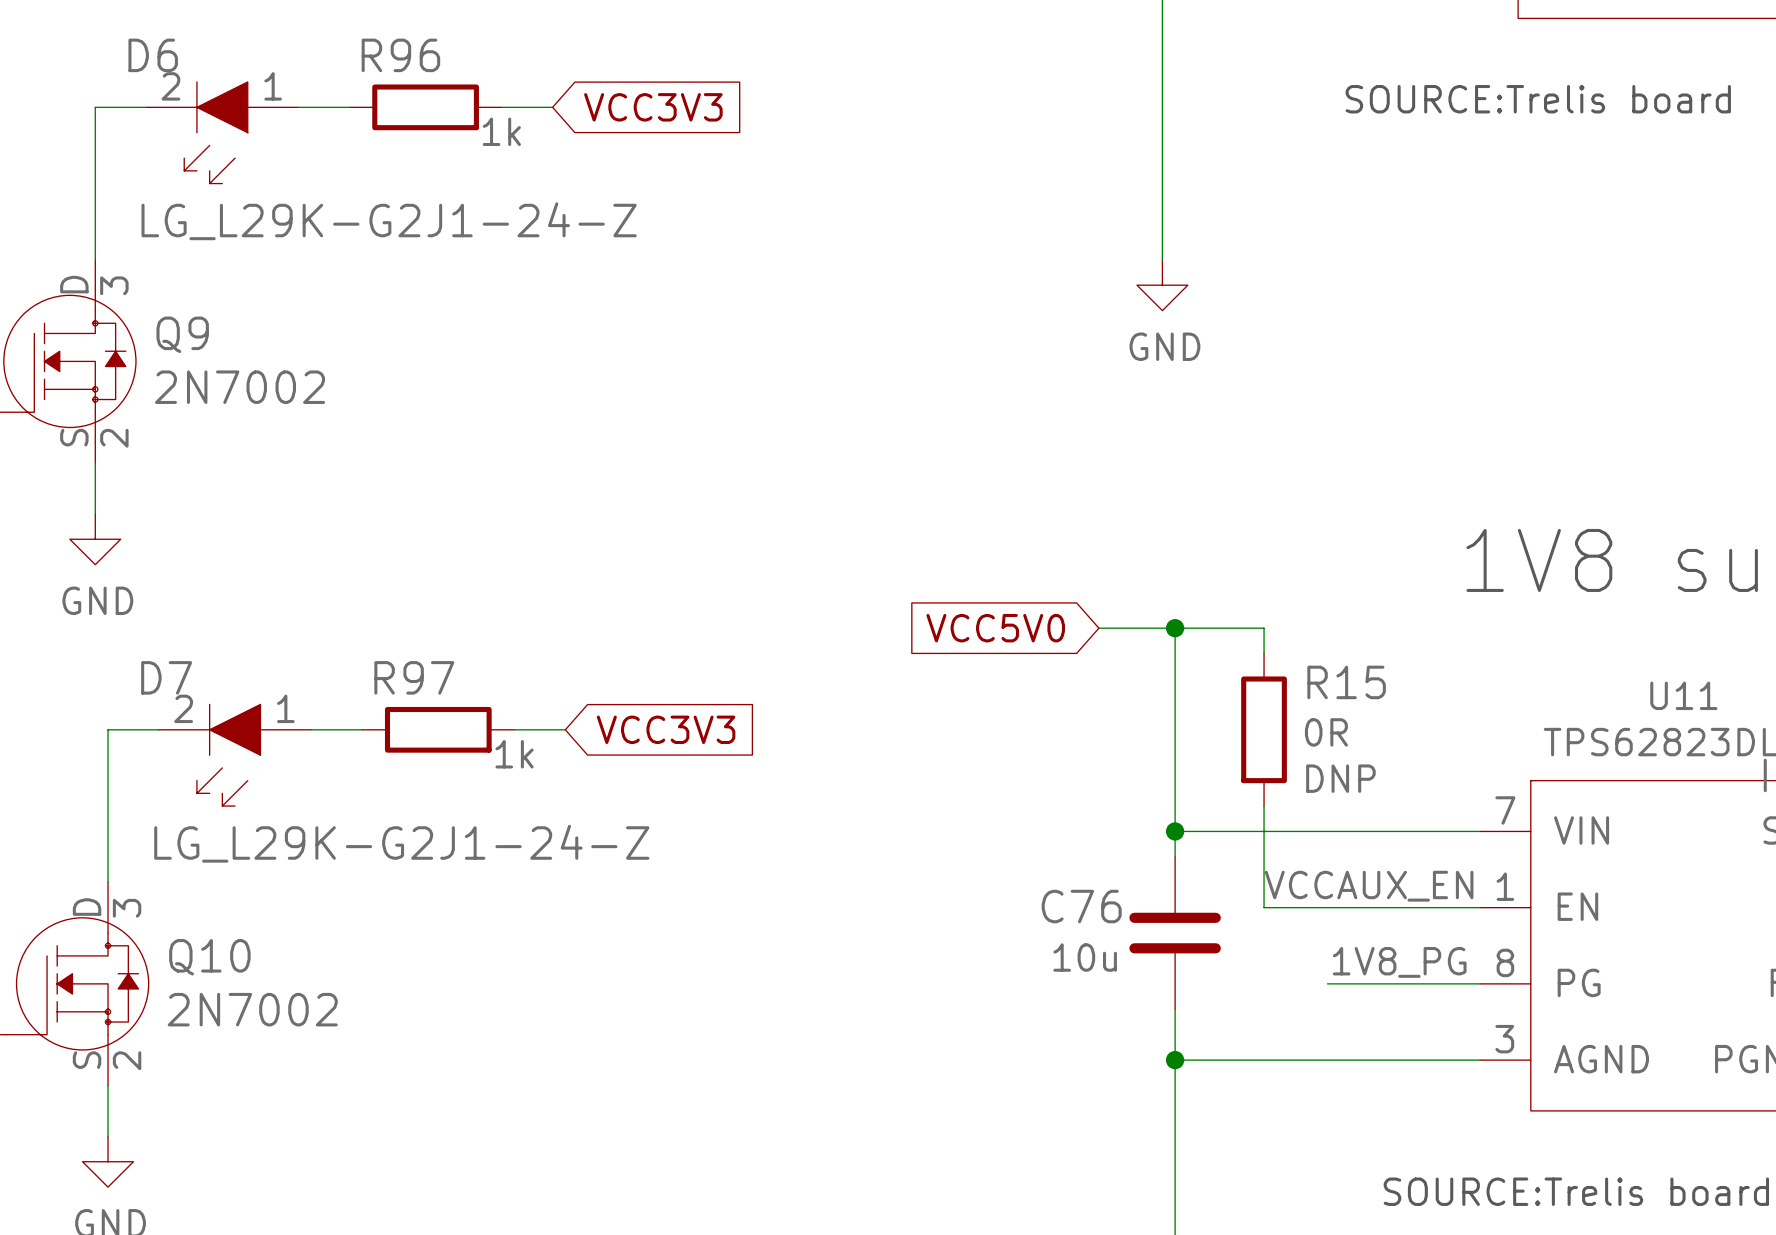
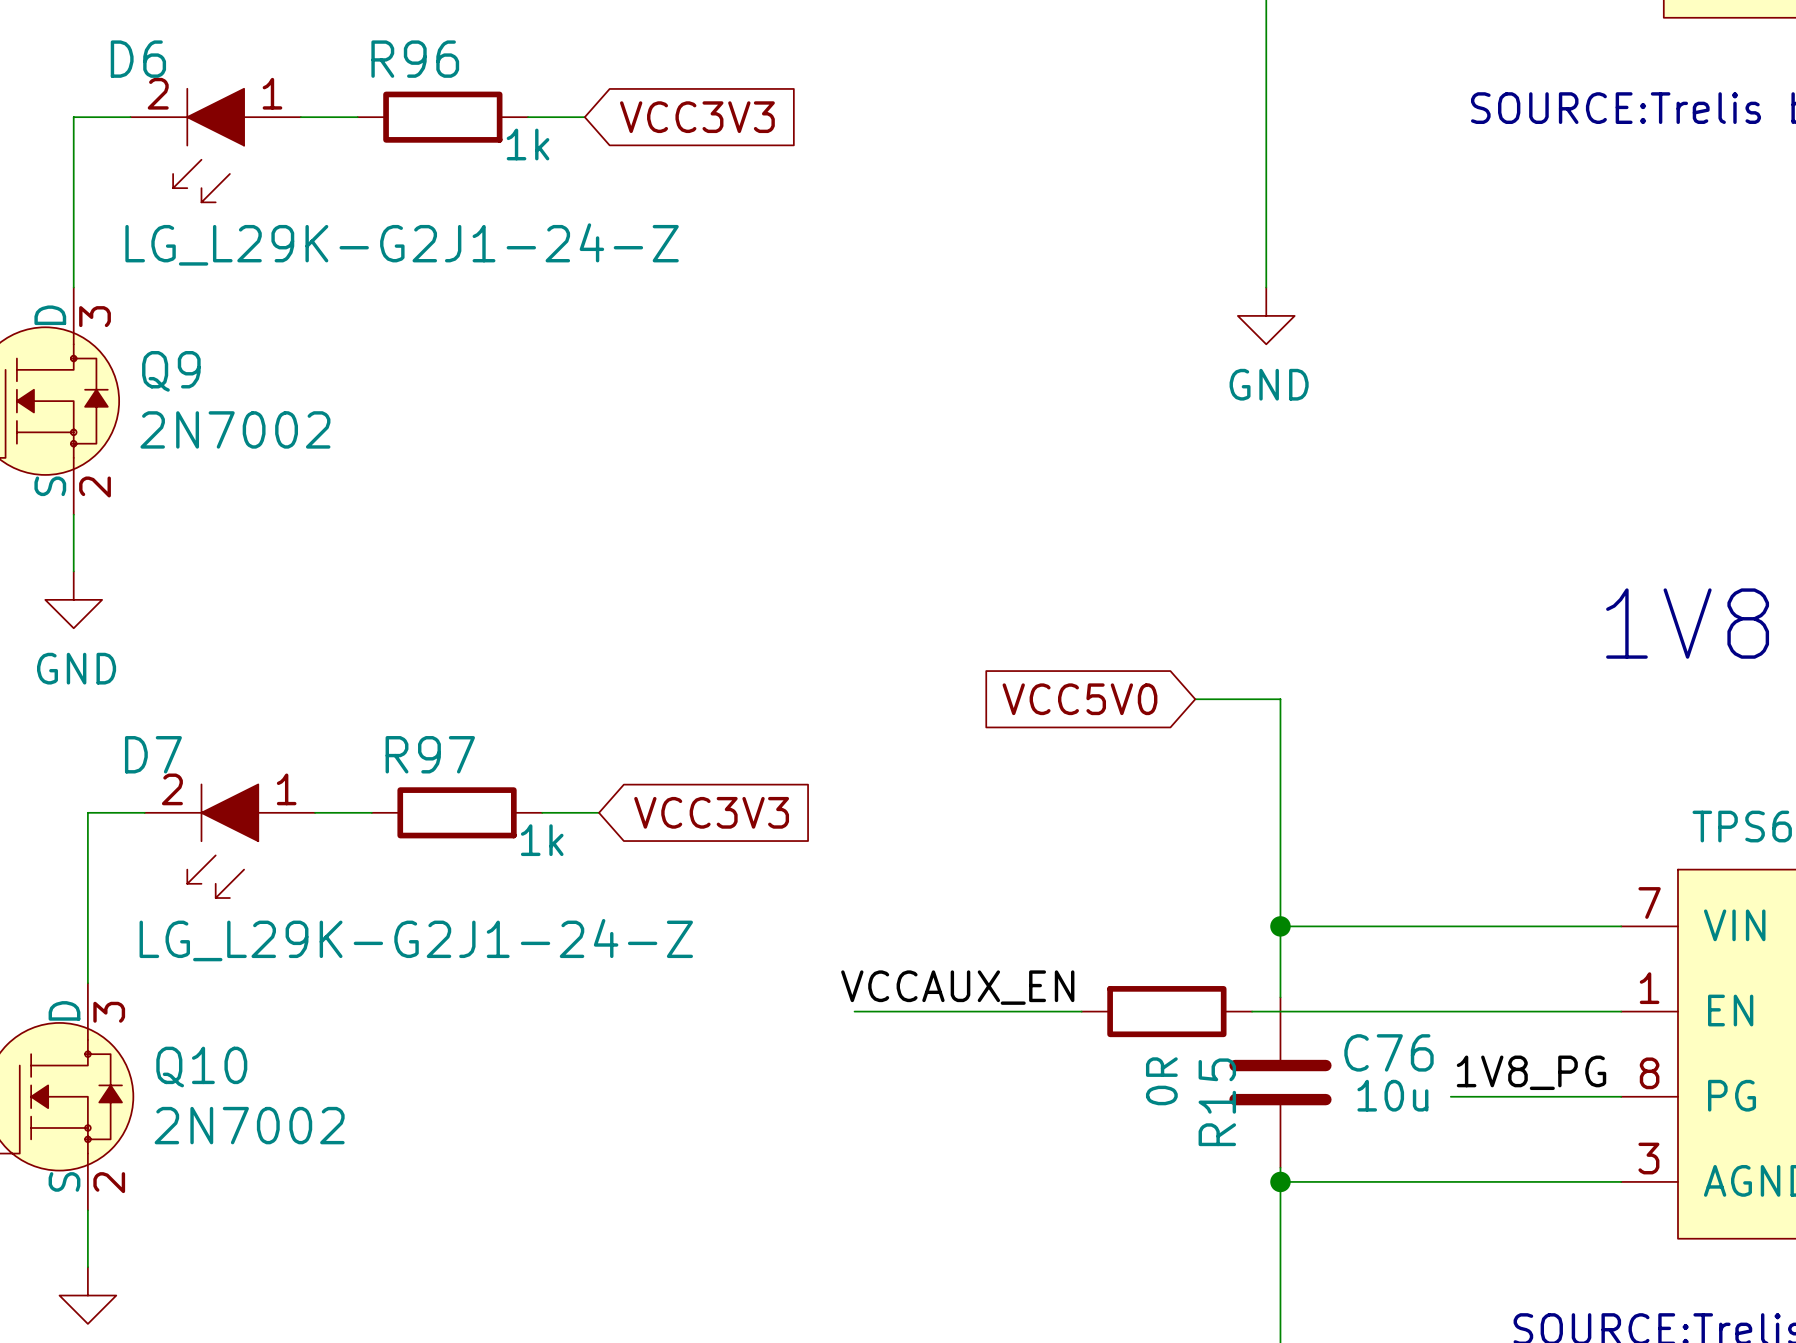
wire: (1175, 628) (1264, 628) (1264, 653) -> none
junction: (1175, 628) -> none
R15 rotation: 0° (1264, 729) -> 90° clockwise (1166, 1011)
R15 position: (1264, 729) -> (1166, 1011)
R15 text: DNP (1340, 778) -> none
wire: (1264, 806) (1264, 907) -> (1252, 1011) (1379, 1011)
label position: VCCAUX_EN (1369, 886) -> VCCAUX_EN (957, 987)
C76 name position: C76 (1081, 906) -> C76 (1388, 1052)
wire: none -> (854, 1011) (1081, 1011)
C76 position: (1175, 933) -> (1280, 1082)
C76 text position: 10u (1085, 957) -> 10u (1392, 1095)

